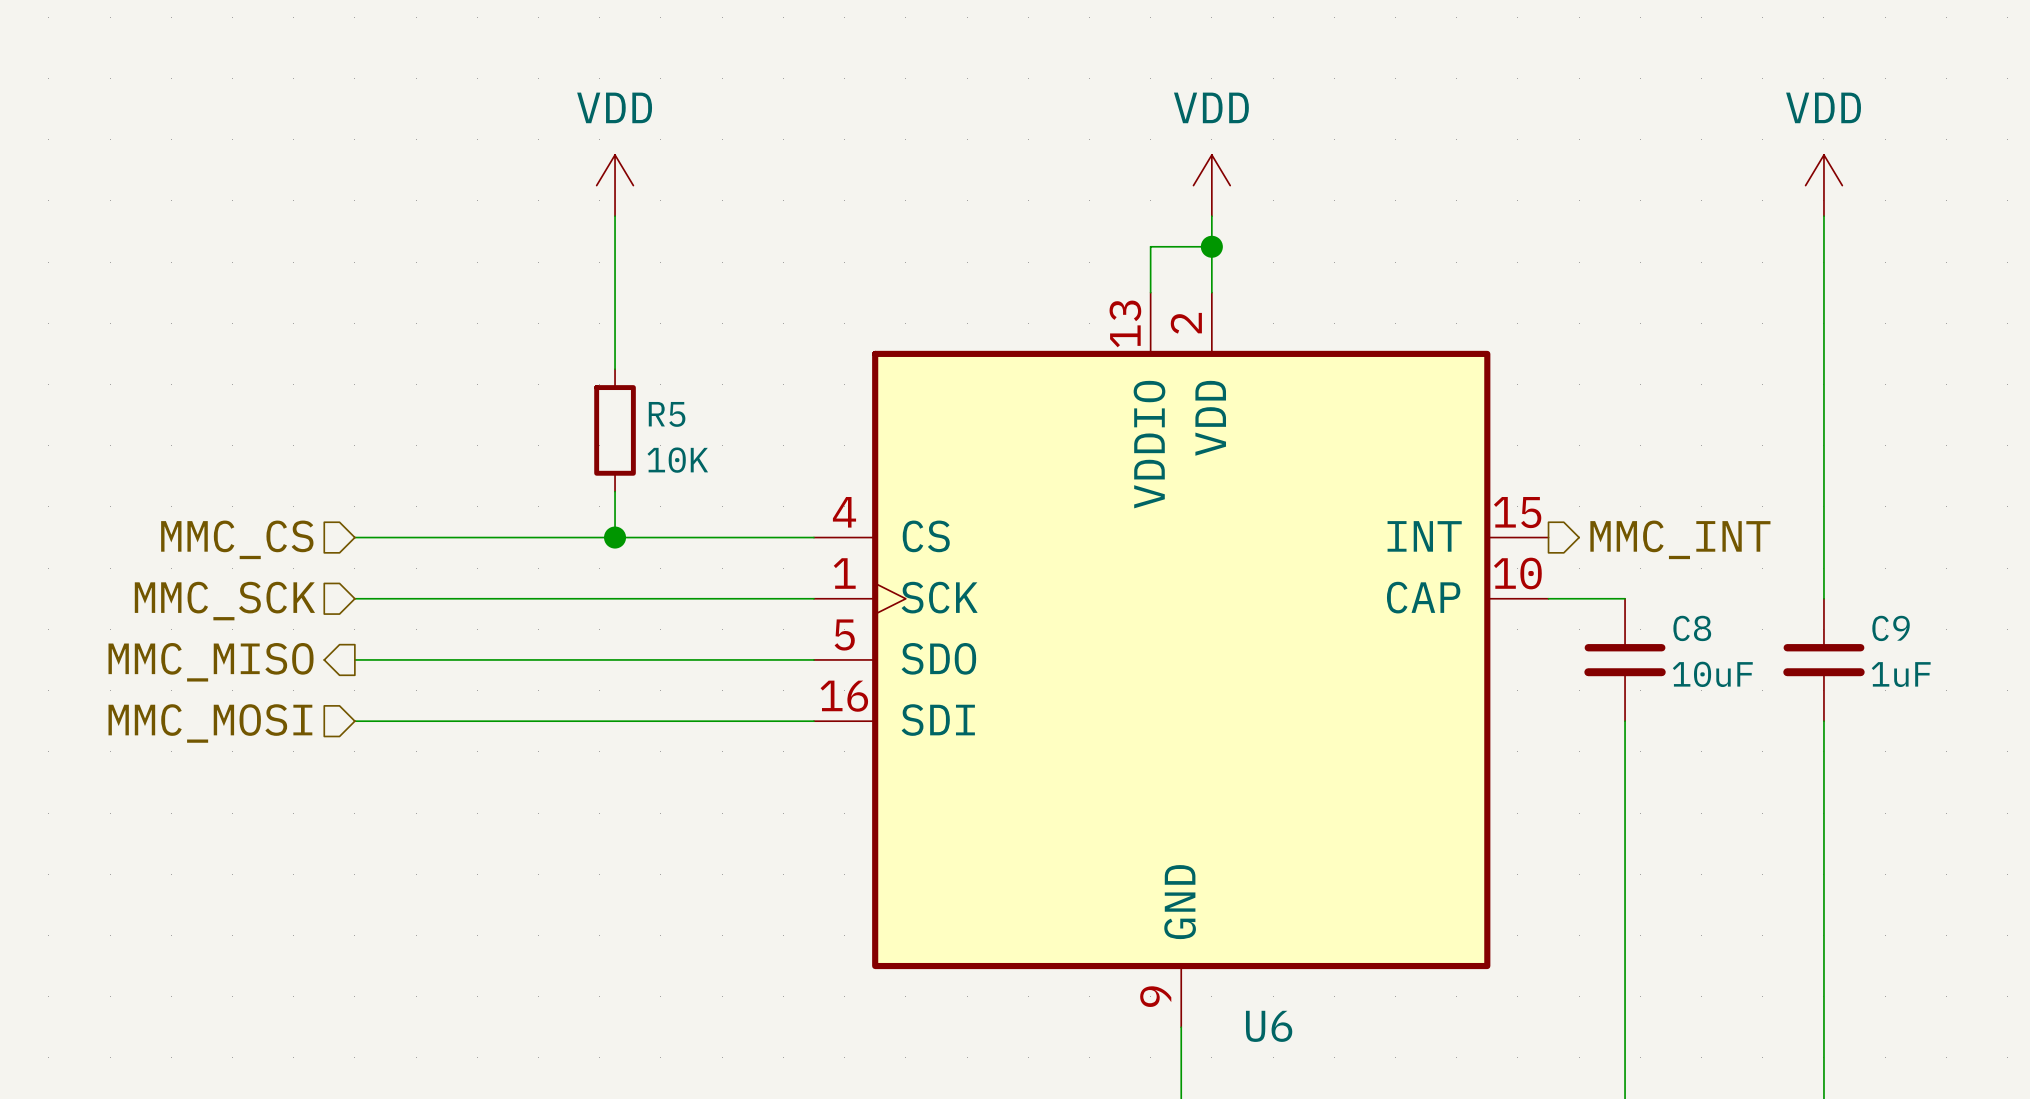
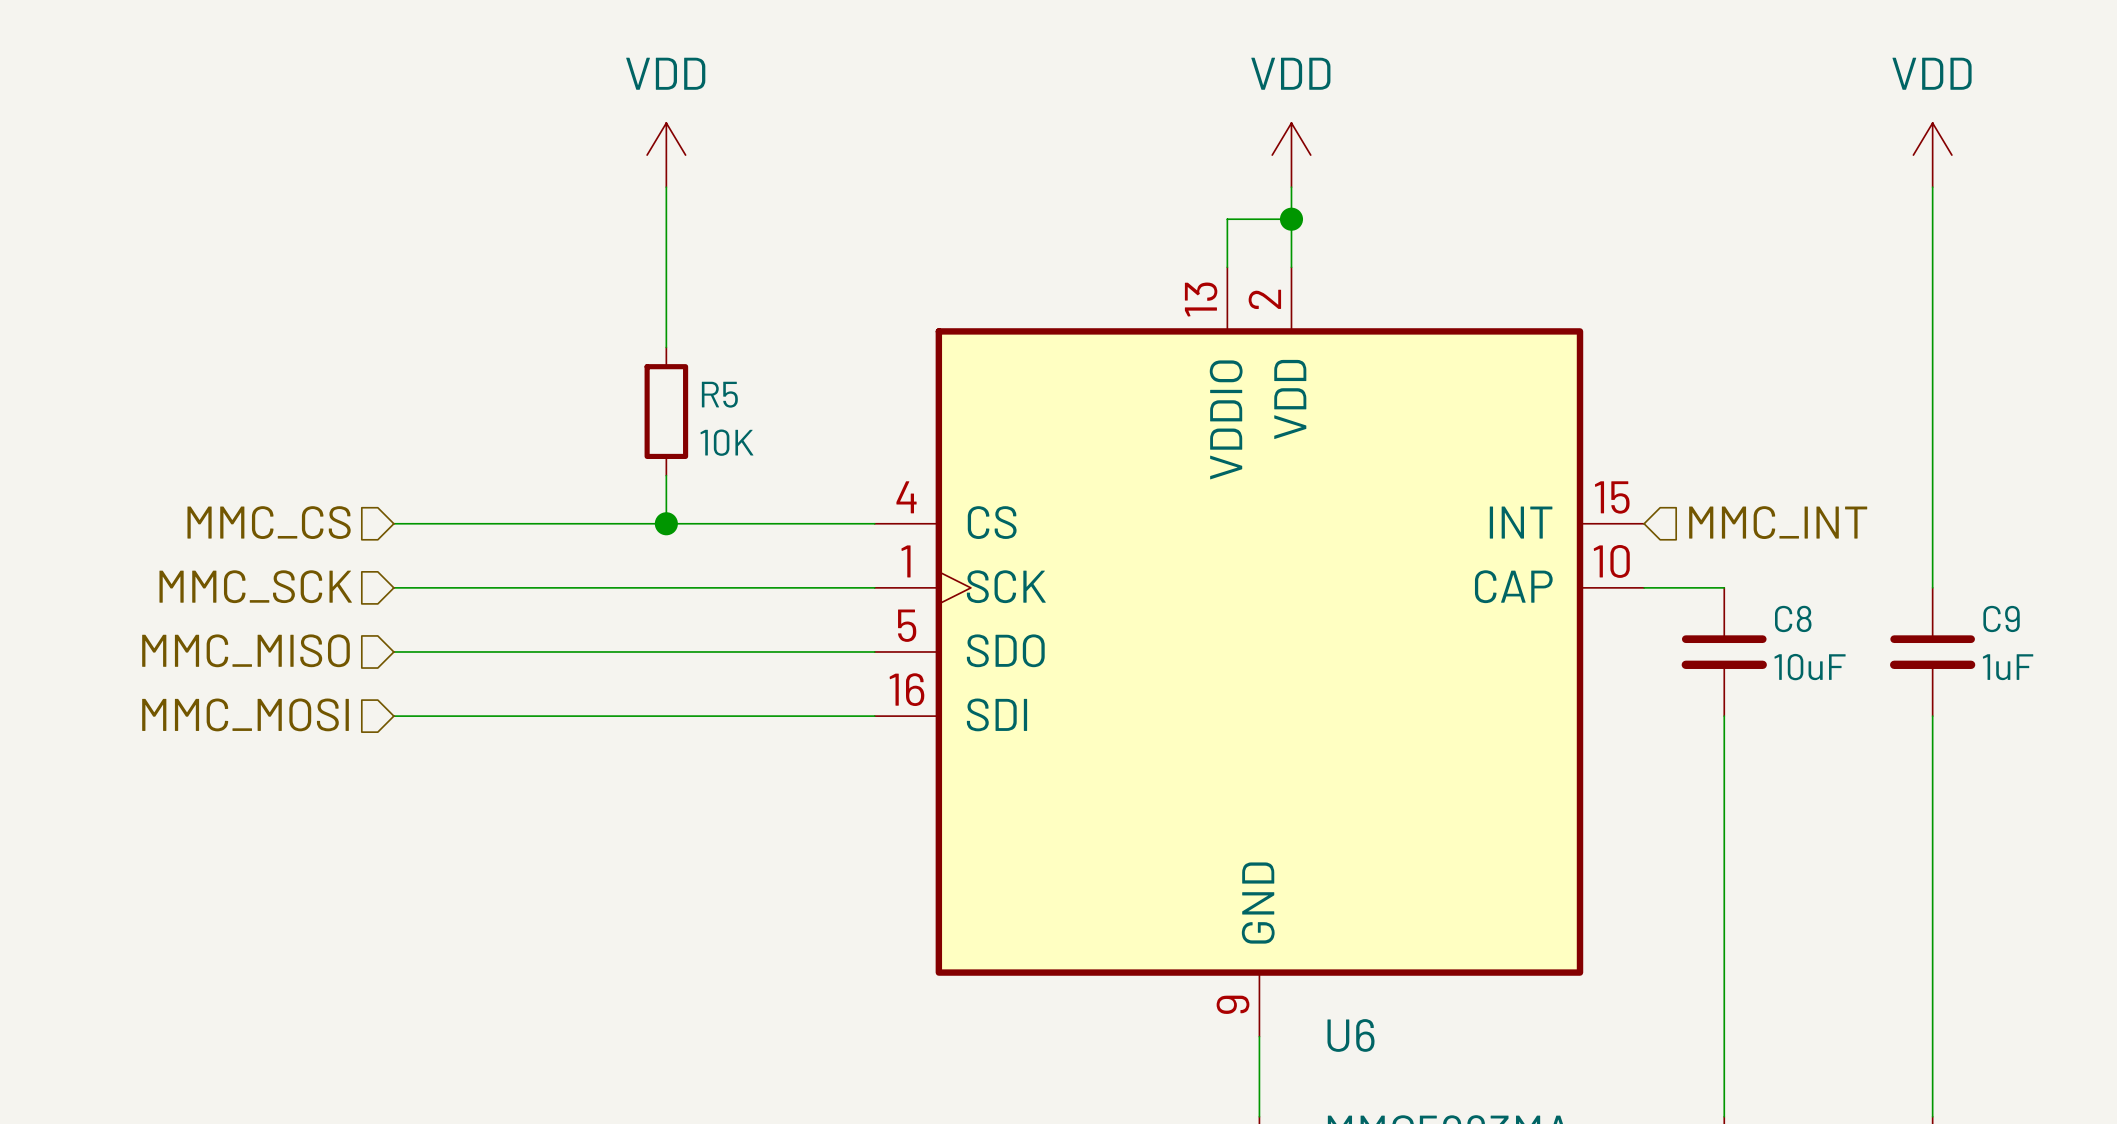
hierarchical label shape: output (1680, 539) -> input (1778, 522)
hierarchical label shape: output (211, 662) -> input (245, 650)

